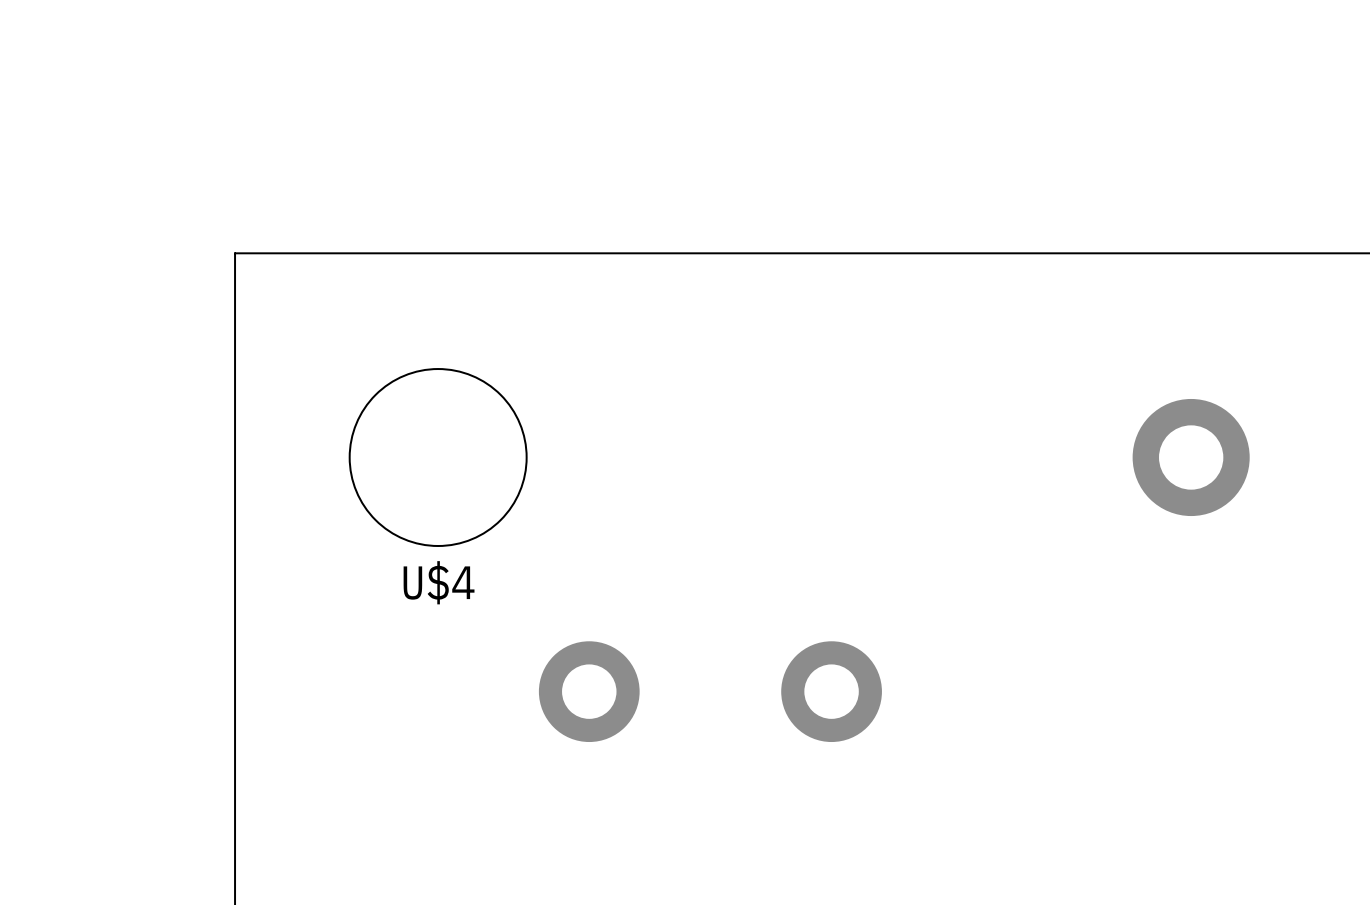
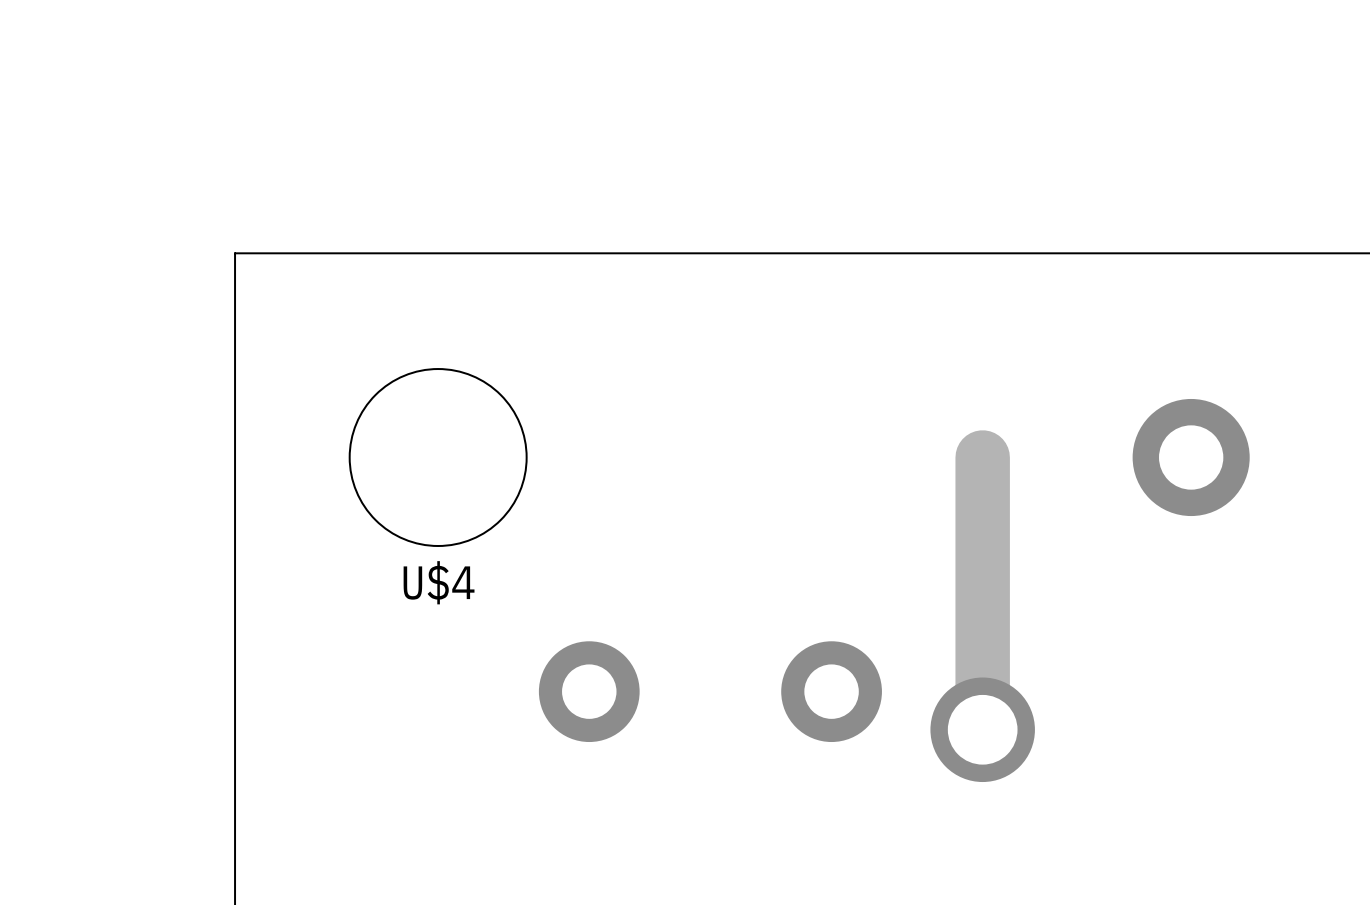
track: none -> (982, 457) (982, 729)
via: none -> (982, 729)

